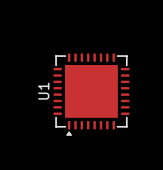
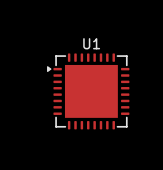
U1 rotation: 0° (91, 94) -> 90° clockwise (88, 91)

